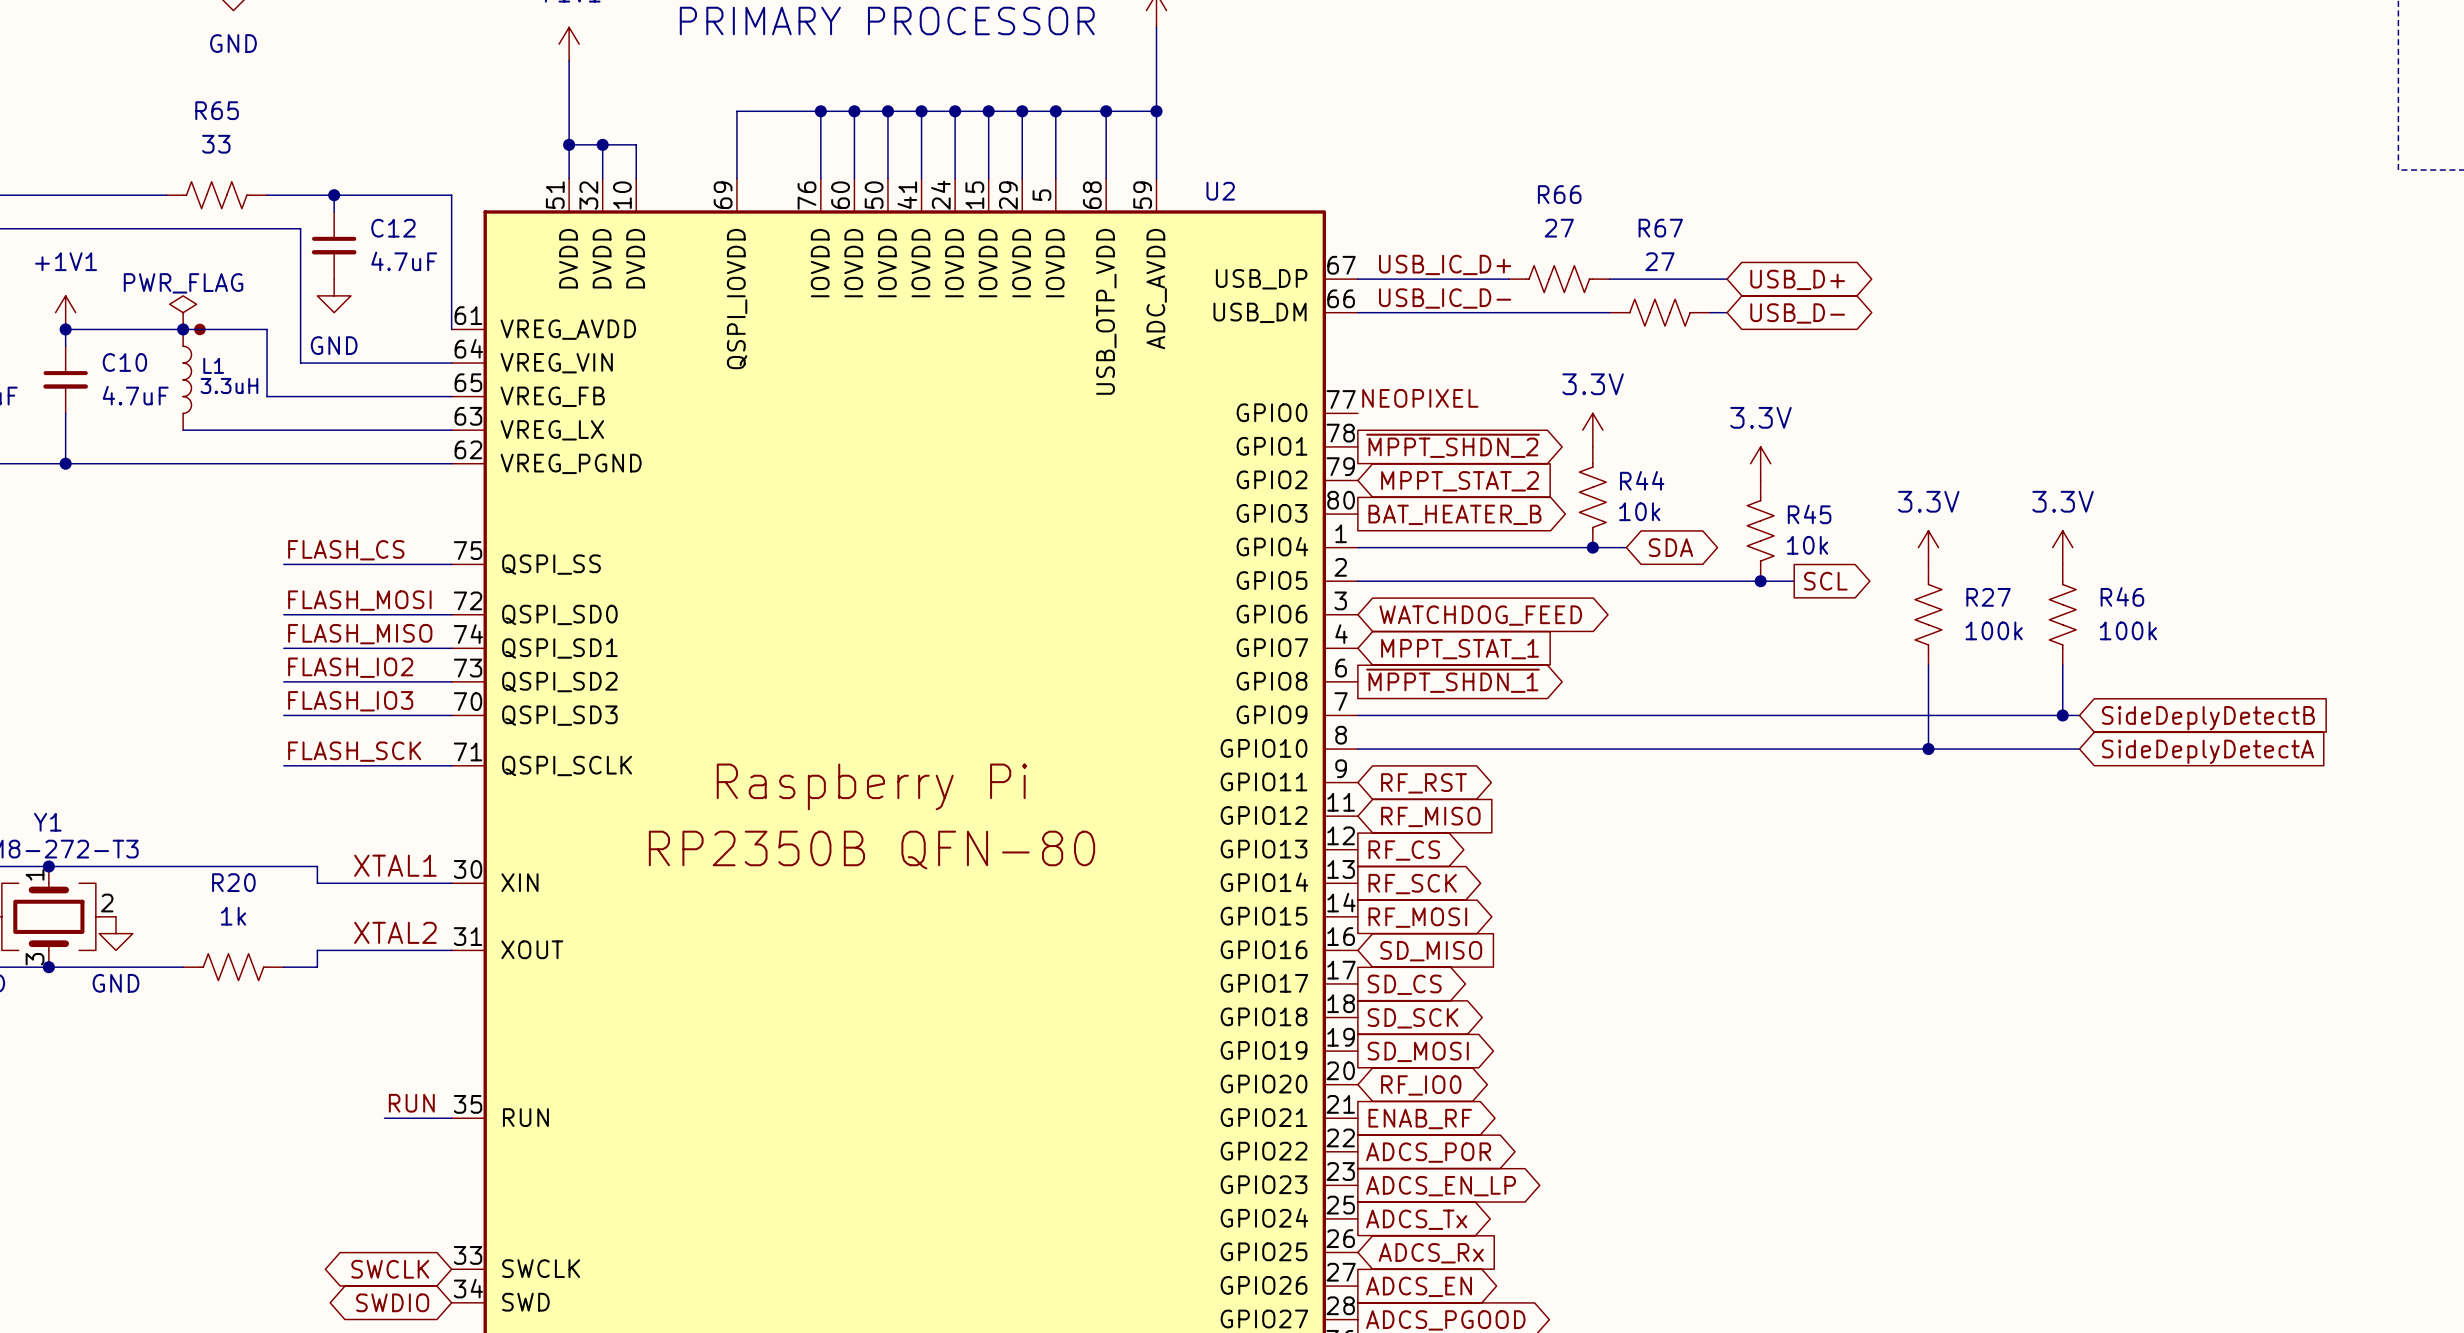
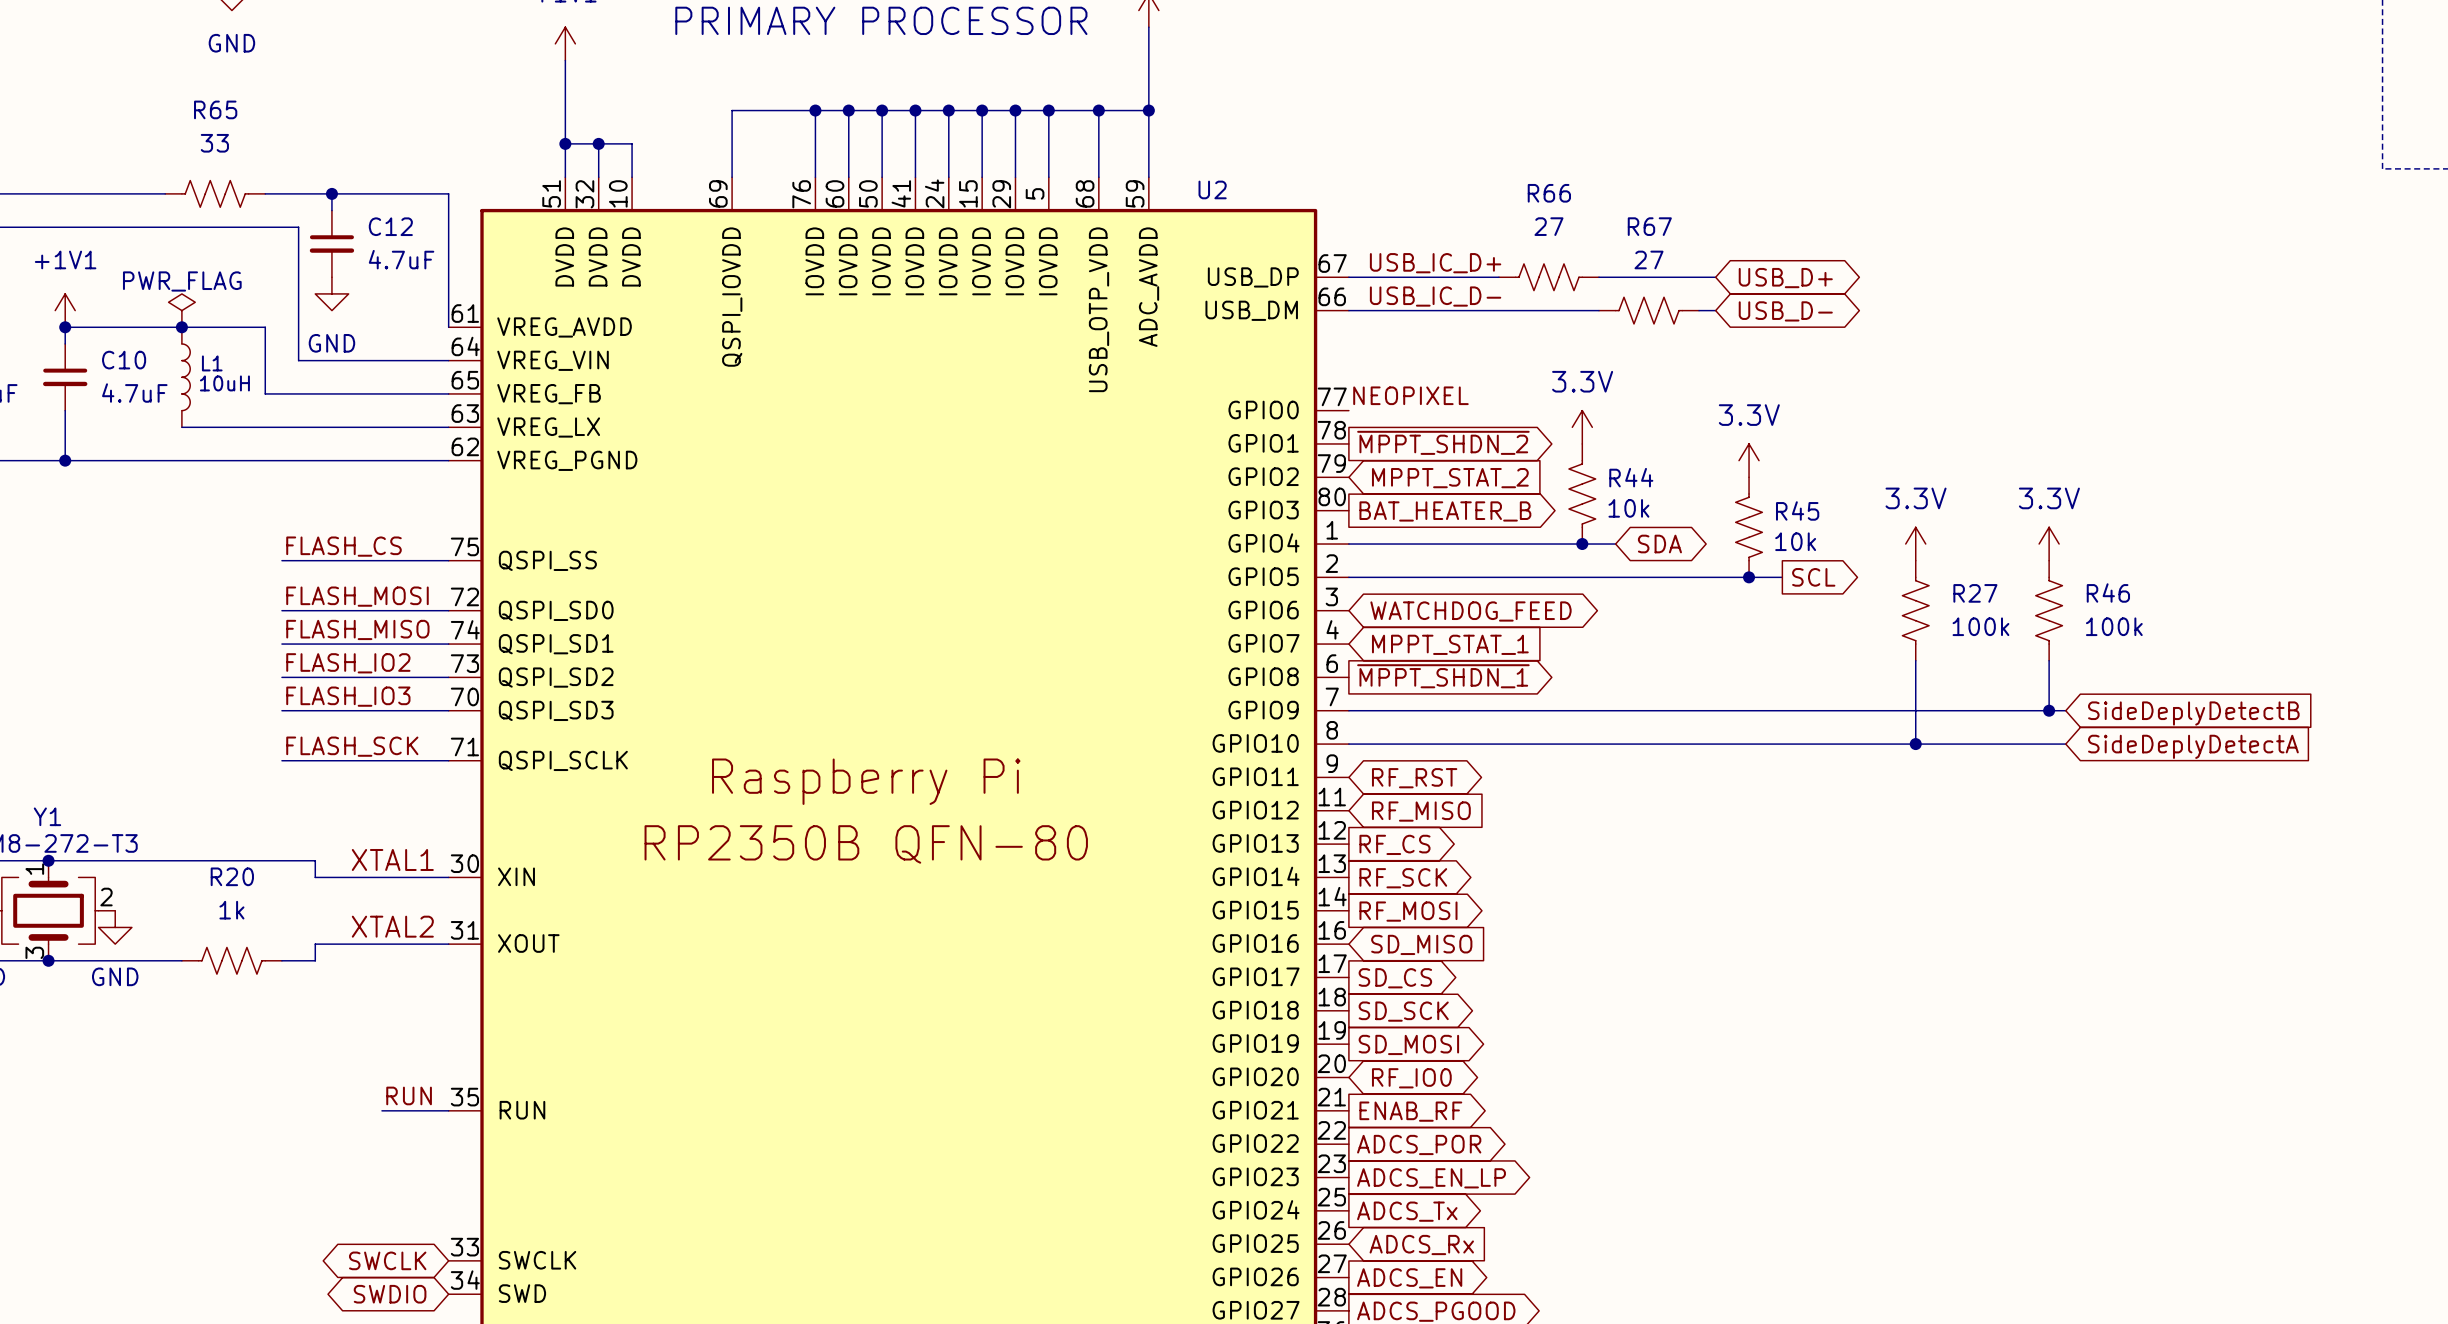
L1 symbol: [183, 324, 205, 431] -> [181, 327, 191, 428]
L1 value: 3.3uH (229, 385) -> 10uH (224, 383)

